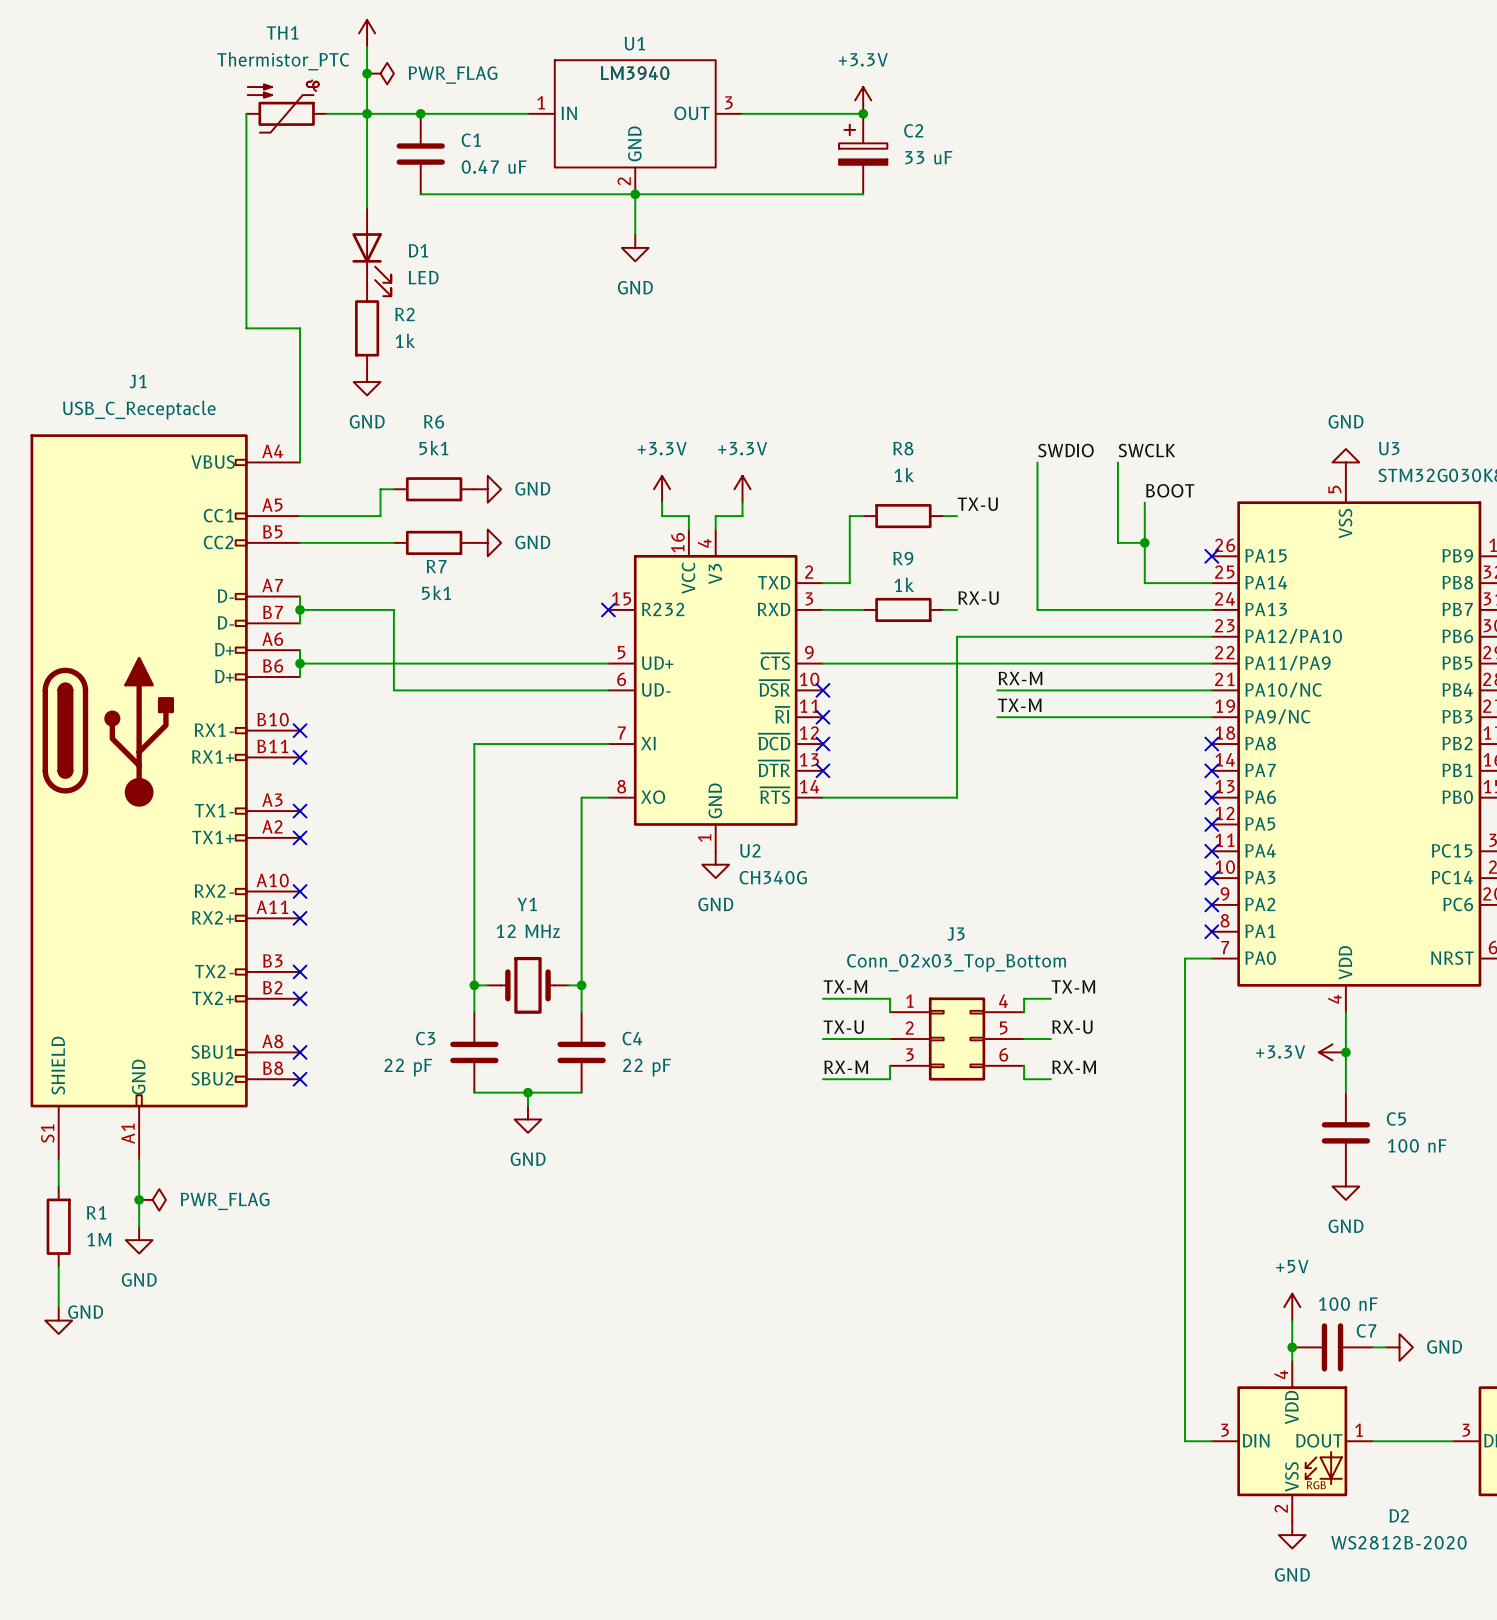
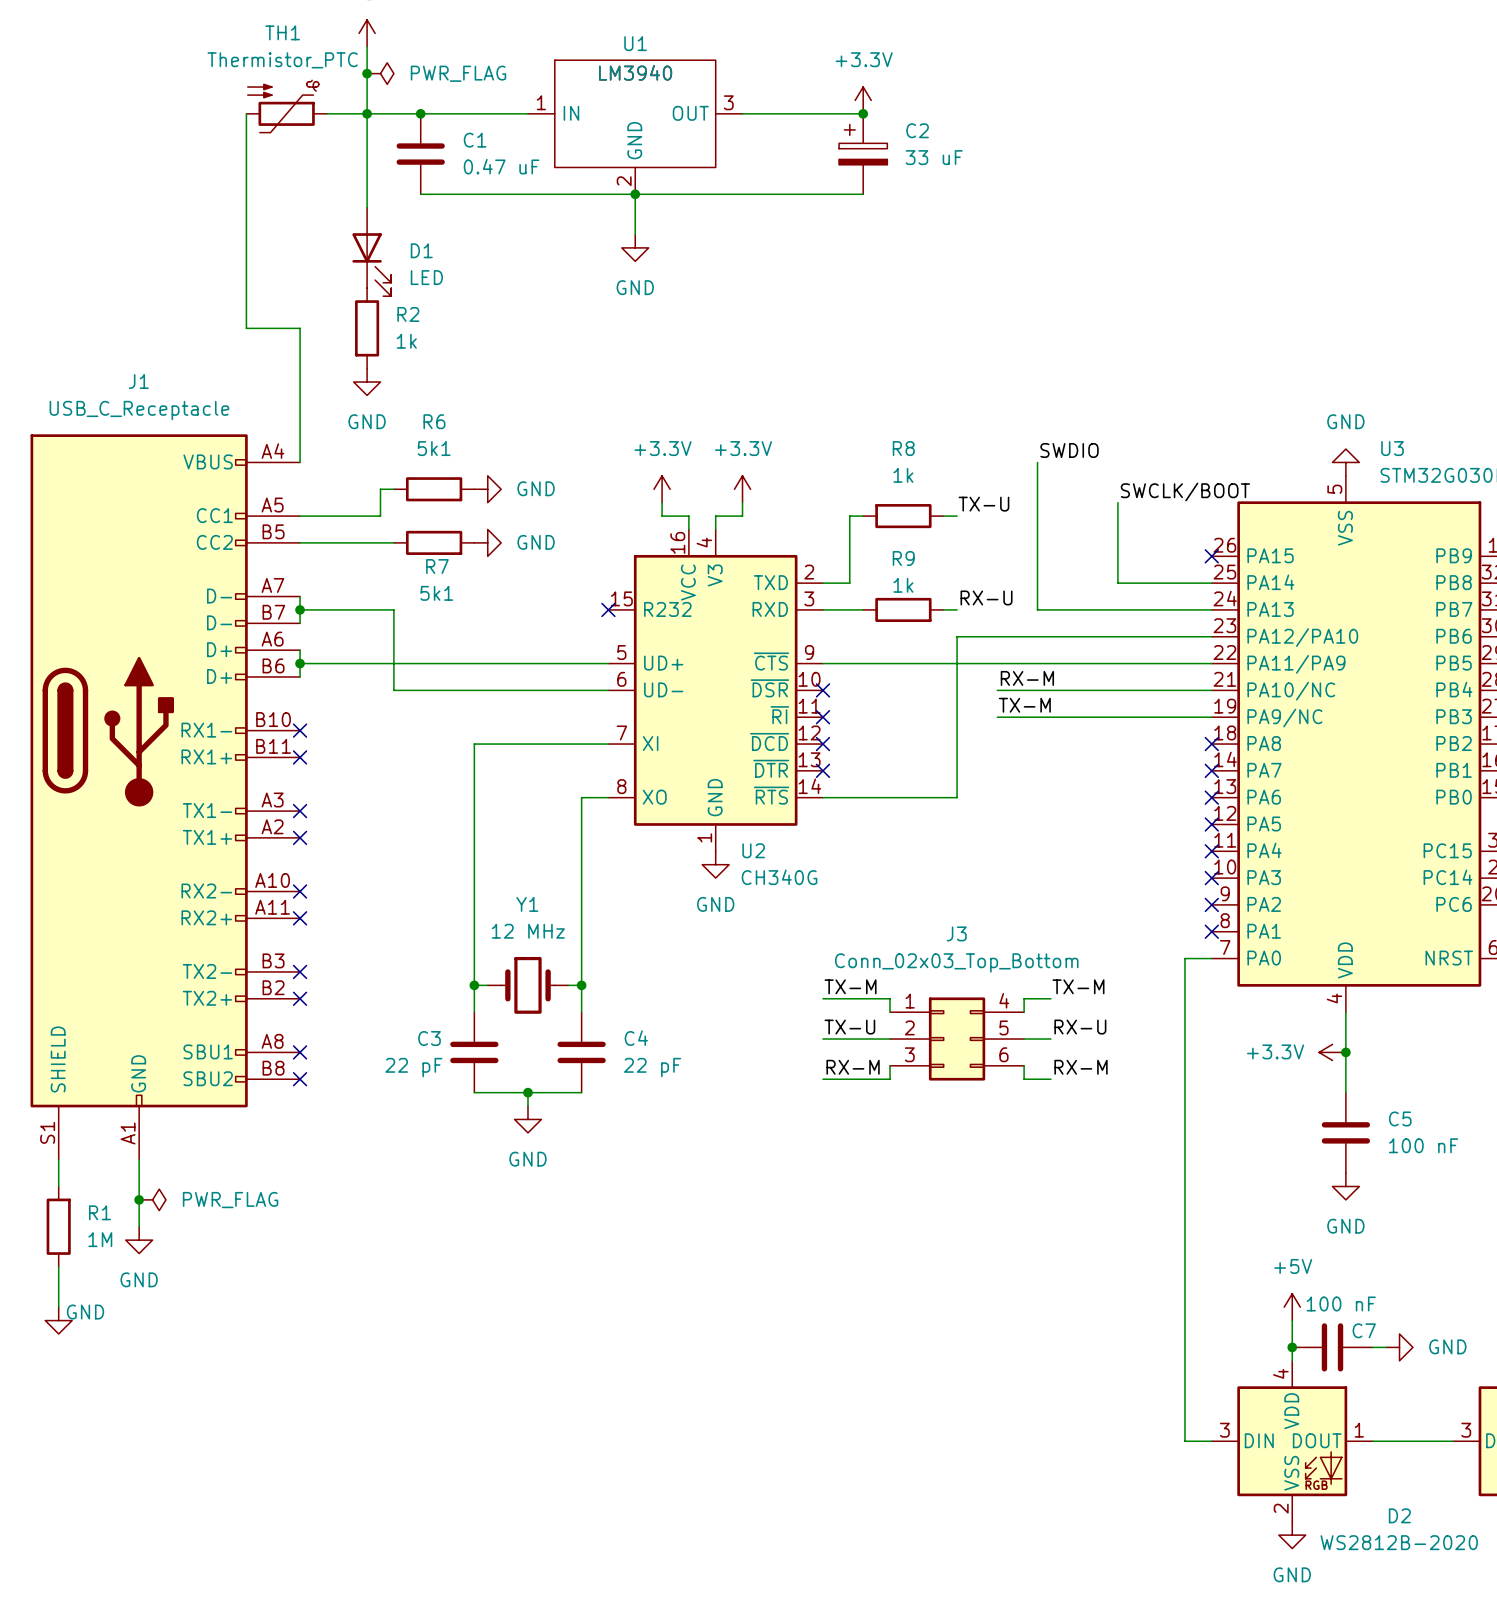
label: SWCLK (1146, 450) -> none
wire: (1117, 462) (1117, 502) -> none
label: BOOT (1170, 490) -> none
label: none -> SWCLK/BOOT (1185, 491)
wire: (1144, 502) (1144, 583) -> none
wire: (1117, 542) (1144, 542) -> (1117, 542) (1117, 583) (1144, 583)
junction: (1144, 542) -> none

